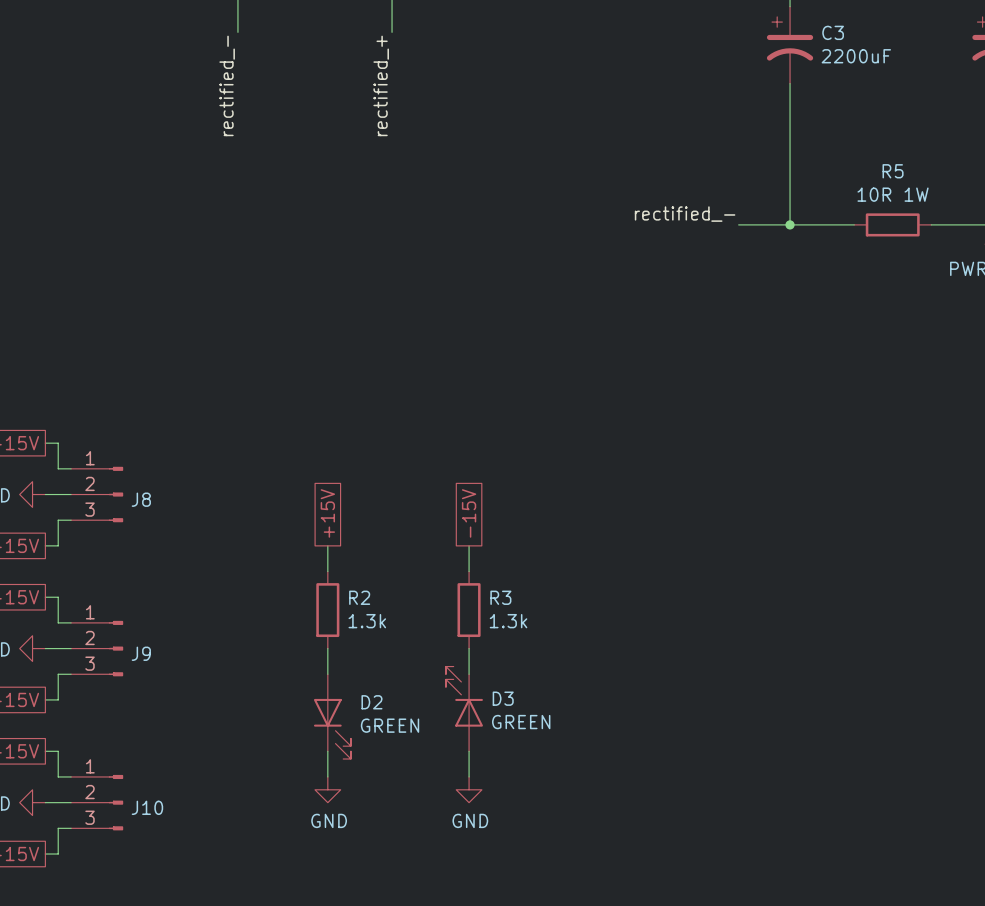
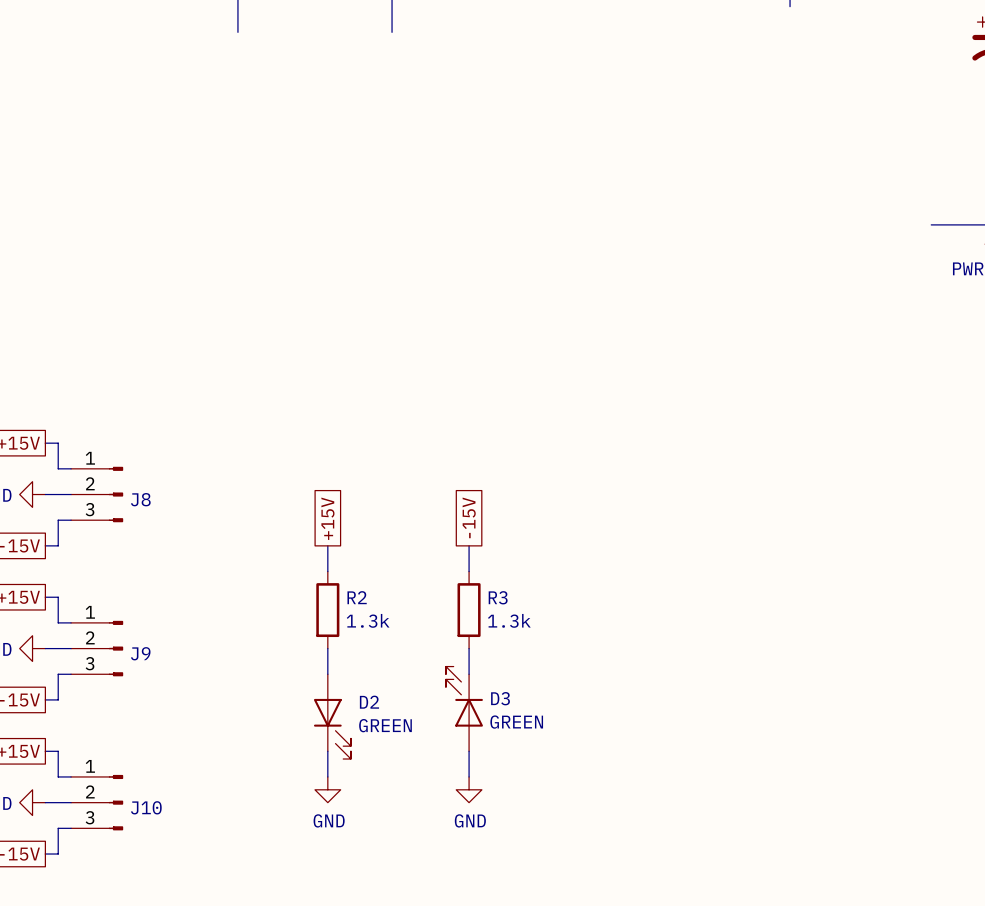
C3: 2200uF (790, 45) -> none
wire: (790, 83) (790, 224) -> none
label: rectified_- (227, 85) -> none
label: rectified_+ (381, 85) -> none
label: rectified_- (685, 214) -> none
wire: (738, 224) (854, 224) -> none
junction: (790, 224) -> none
R5: 10R 1W (892, 224) -> none

